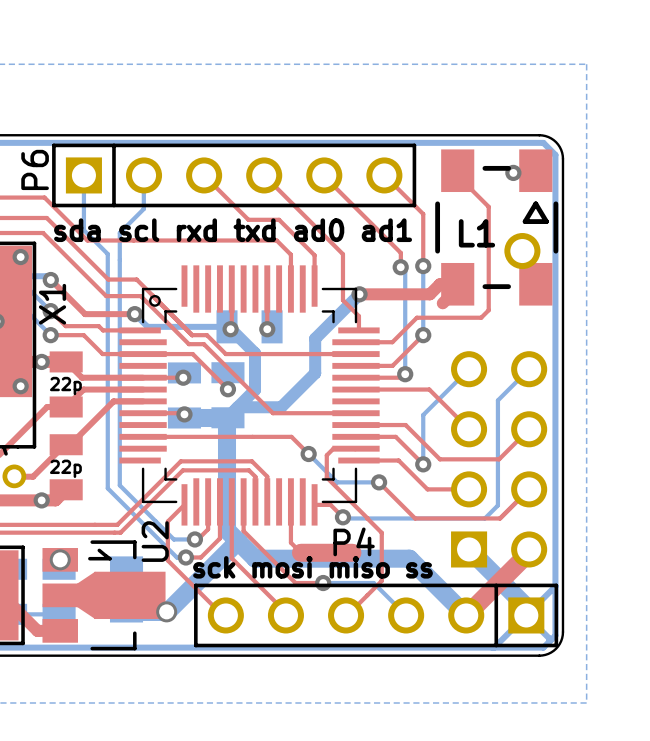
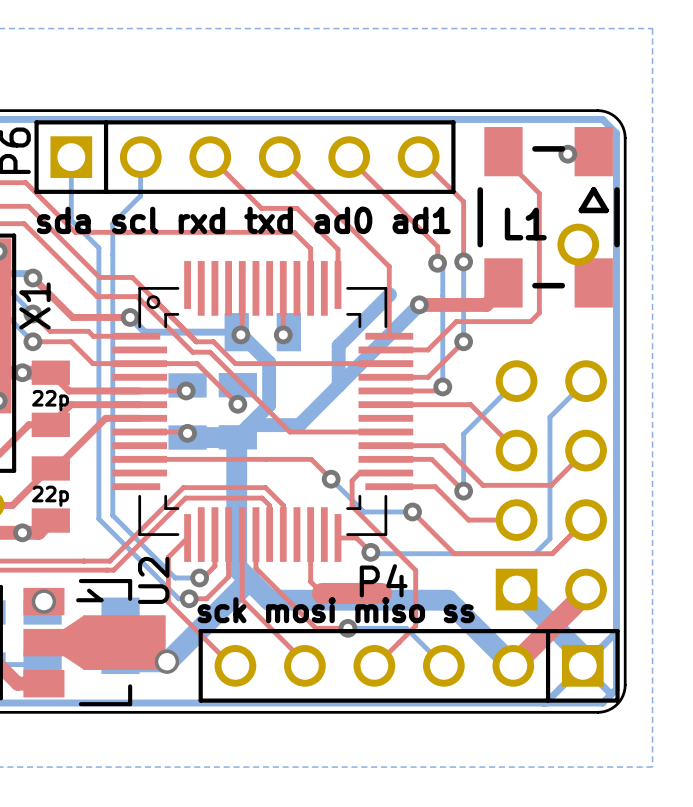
top track: (342, 254) (342, 300) (358, 316) -> (370, 248) (389, 266) (389, 319)
top track: (457, 284) (439, 284) (429, 294) (359, 294) -> none
via position: (359, 294) -> (419, 304)
top track: none -> (419, 304) (486, 304)
bottom track: (315, 373) (281, 407) -> (419, 304) (299, 425)

